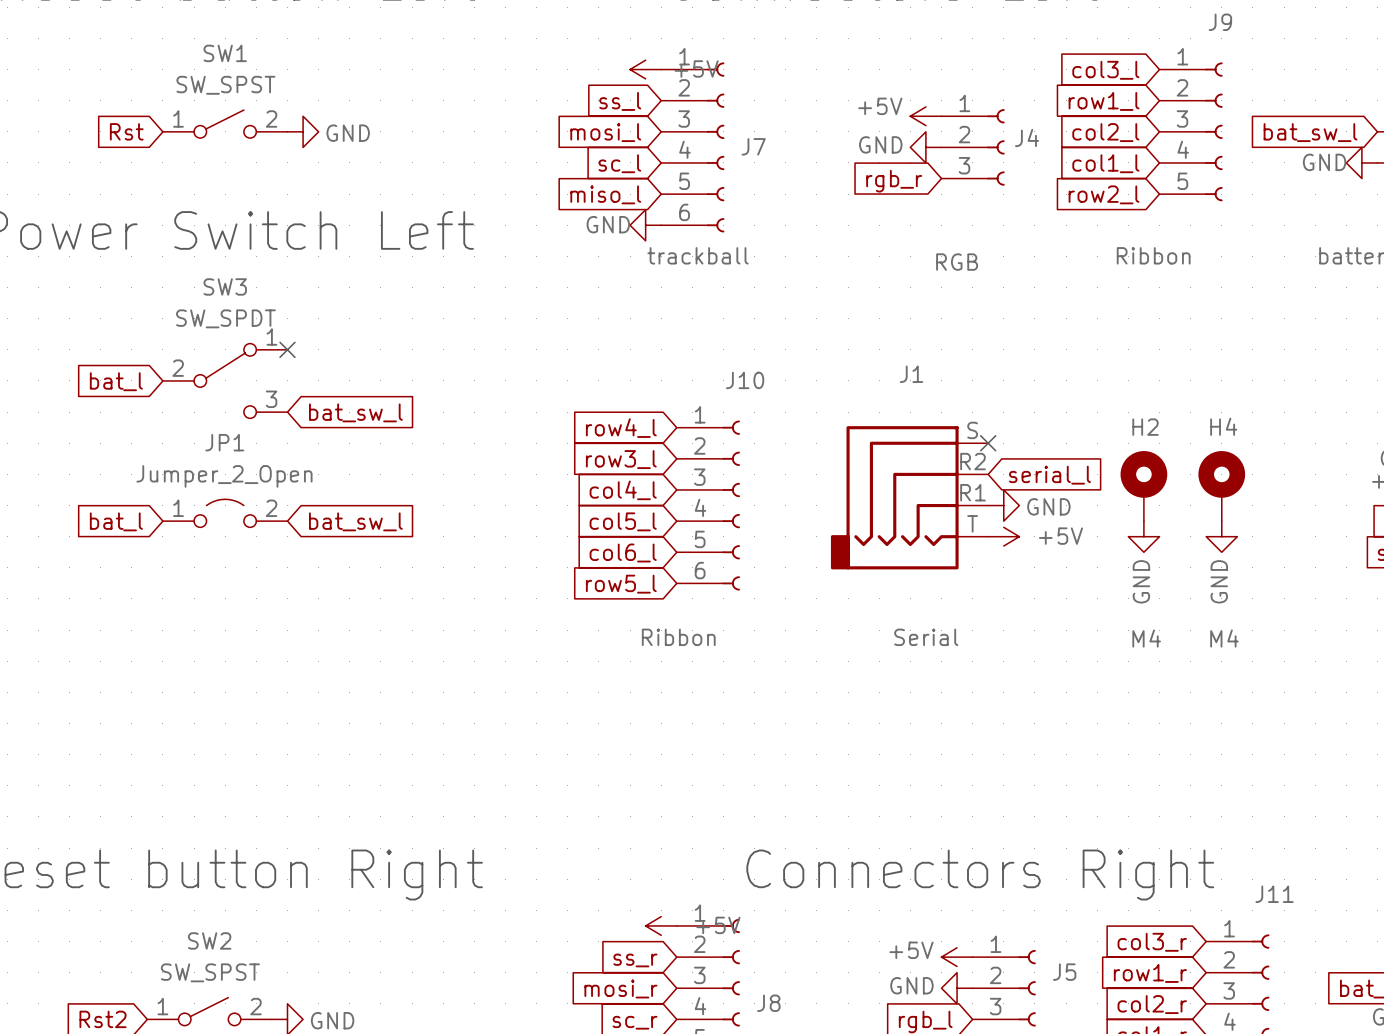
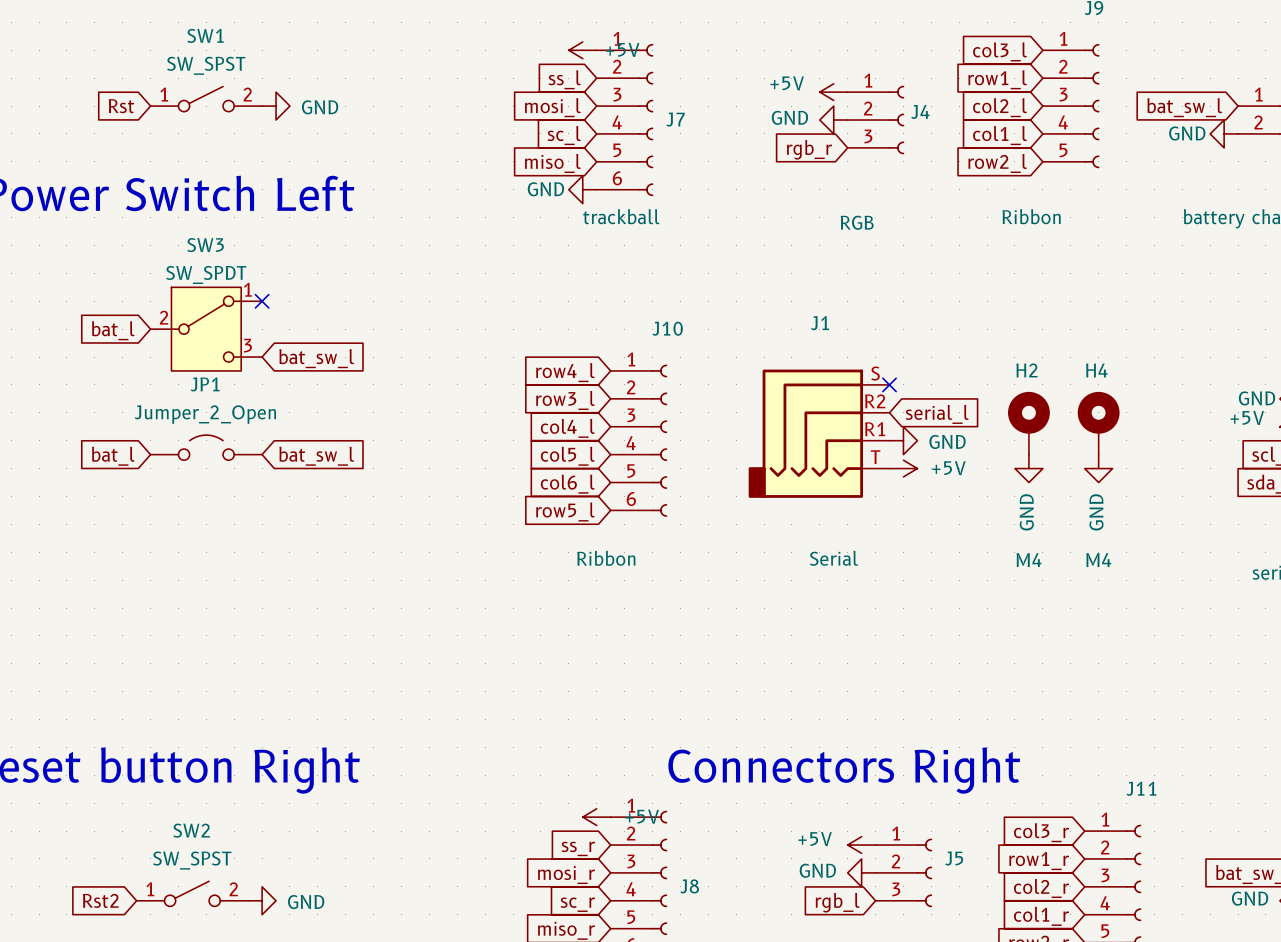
SW3 symbol: [162, 343, 288, 419] -> [150, 287, 263, 371]
JP1 pin number: 1 (178, 508) -> none
JP1 pin number: 2 (271, 508) -> none

